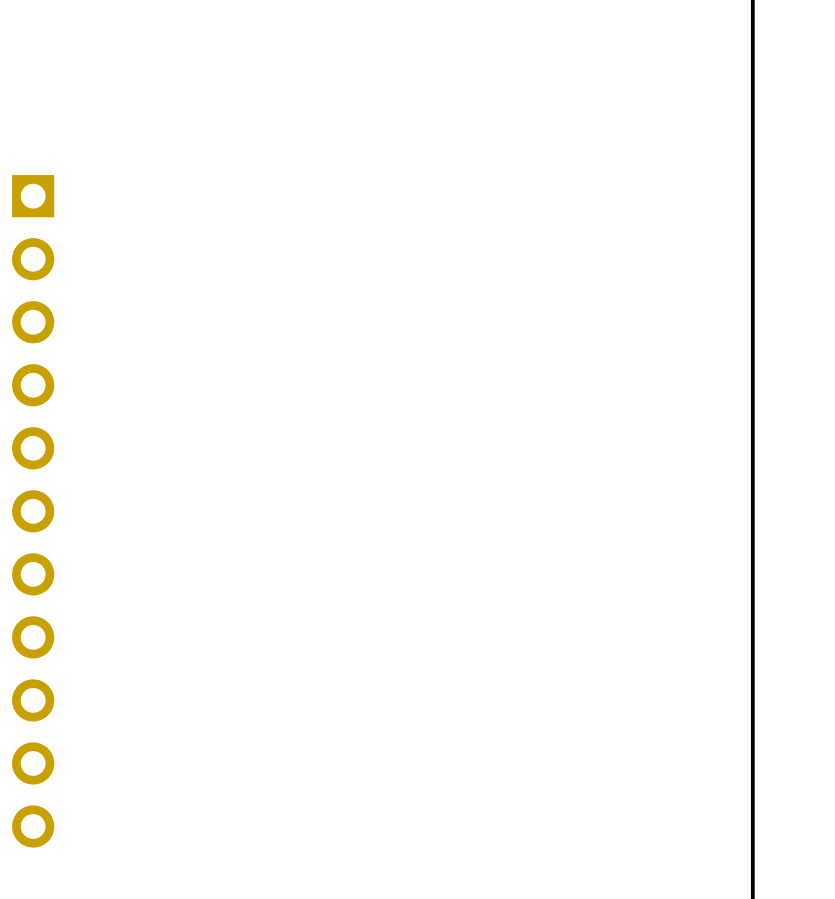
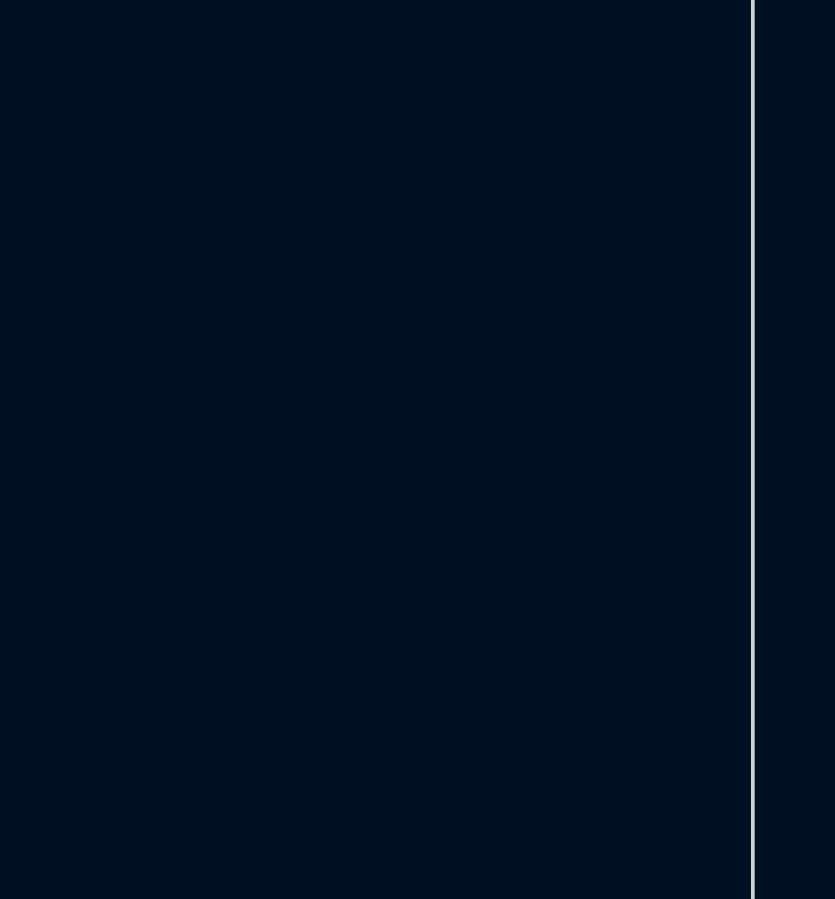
part: (33, 511) -> none

